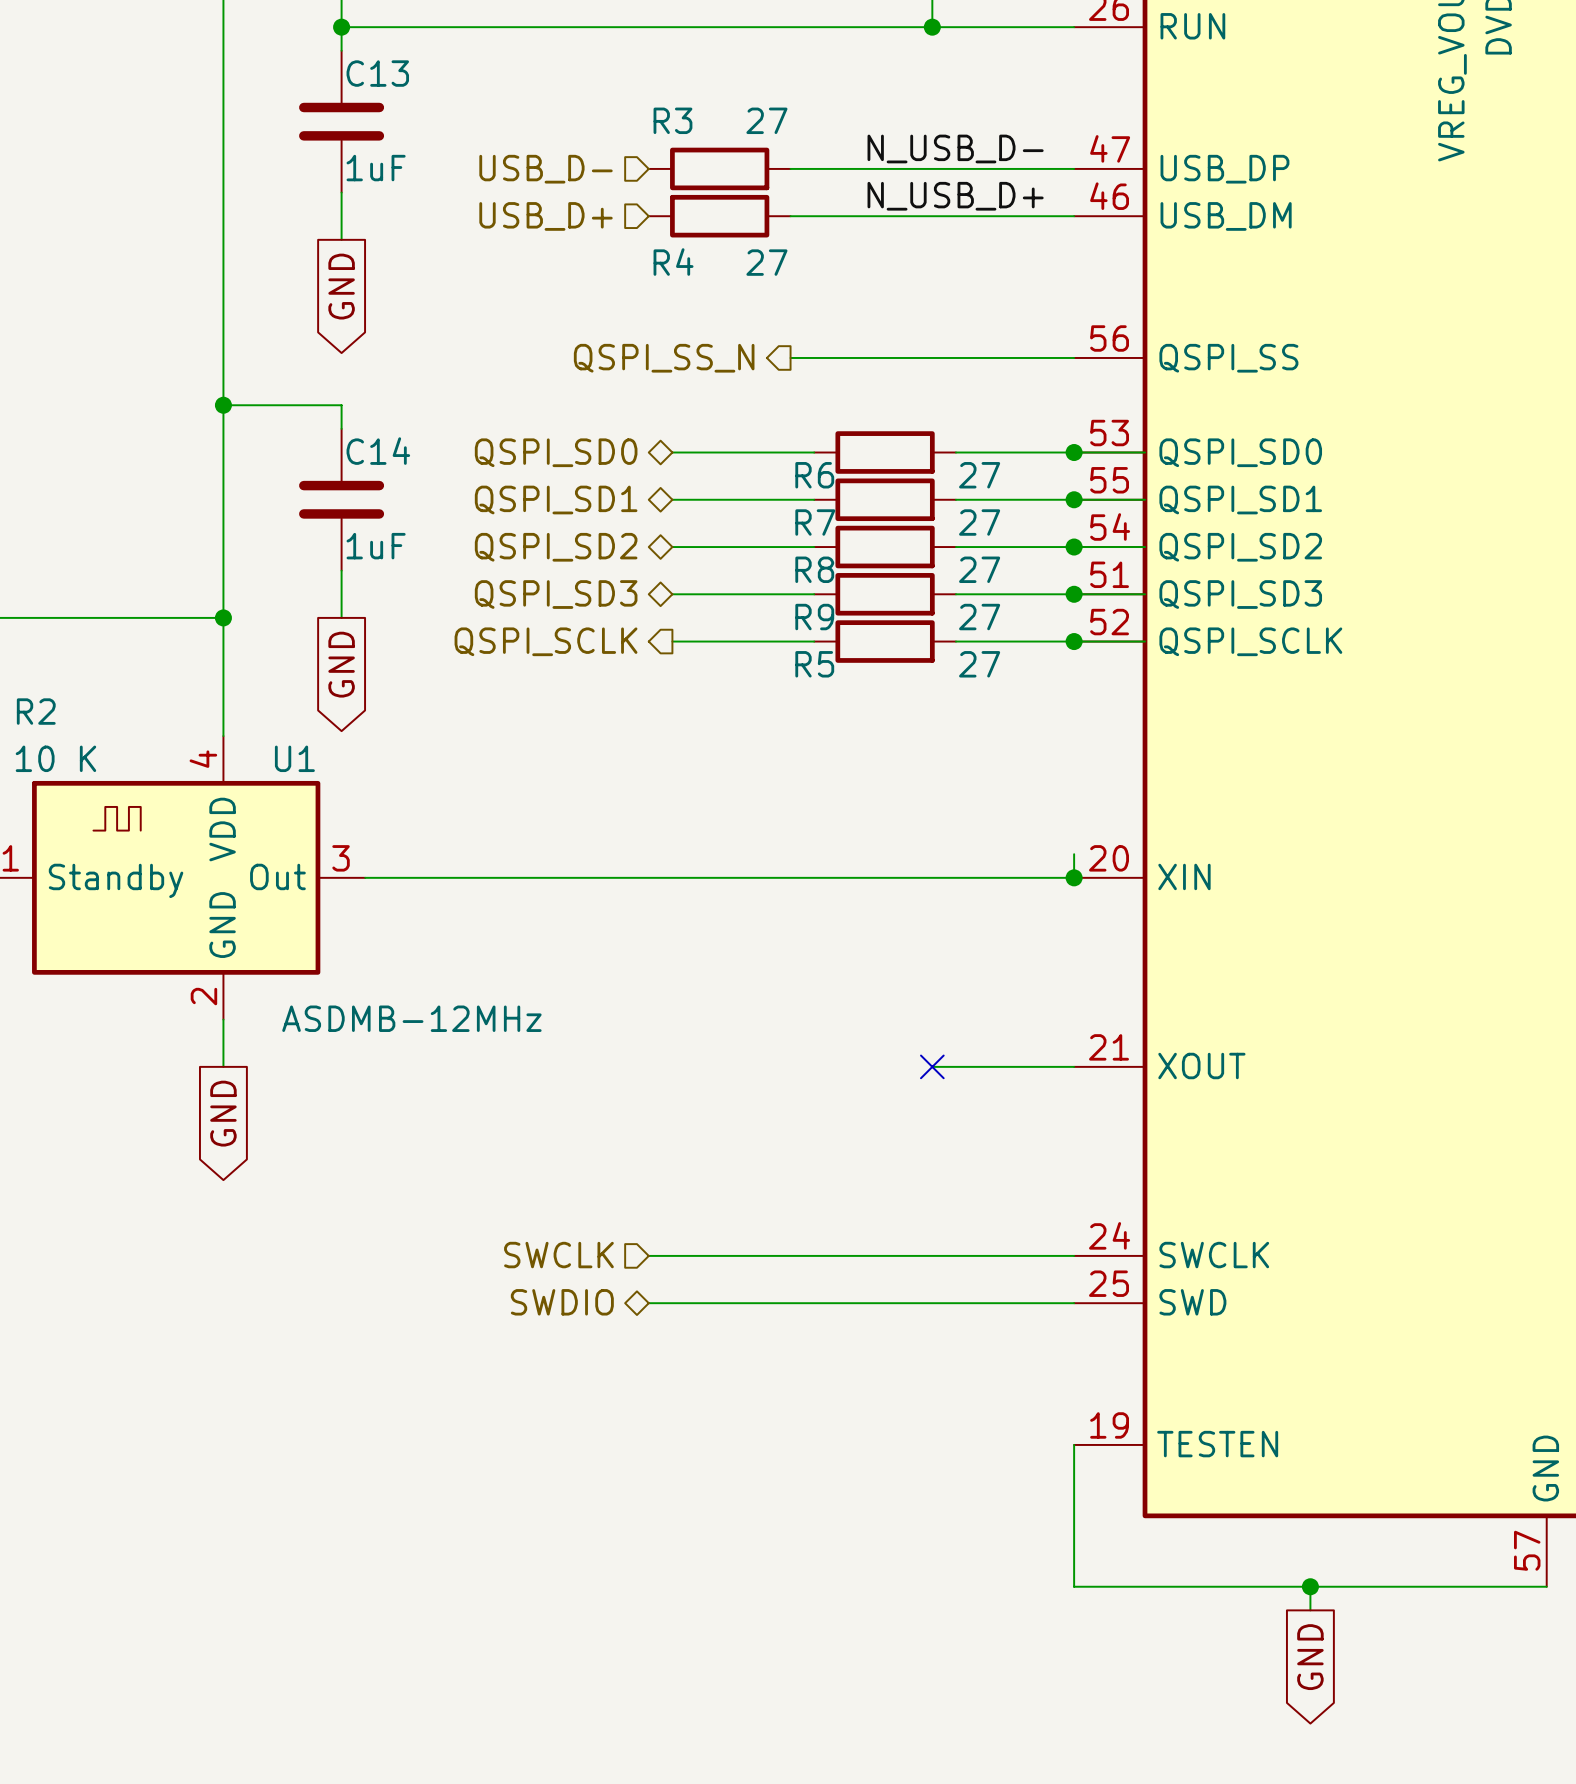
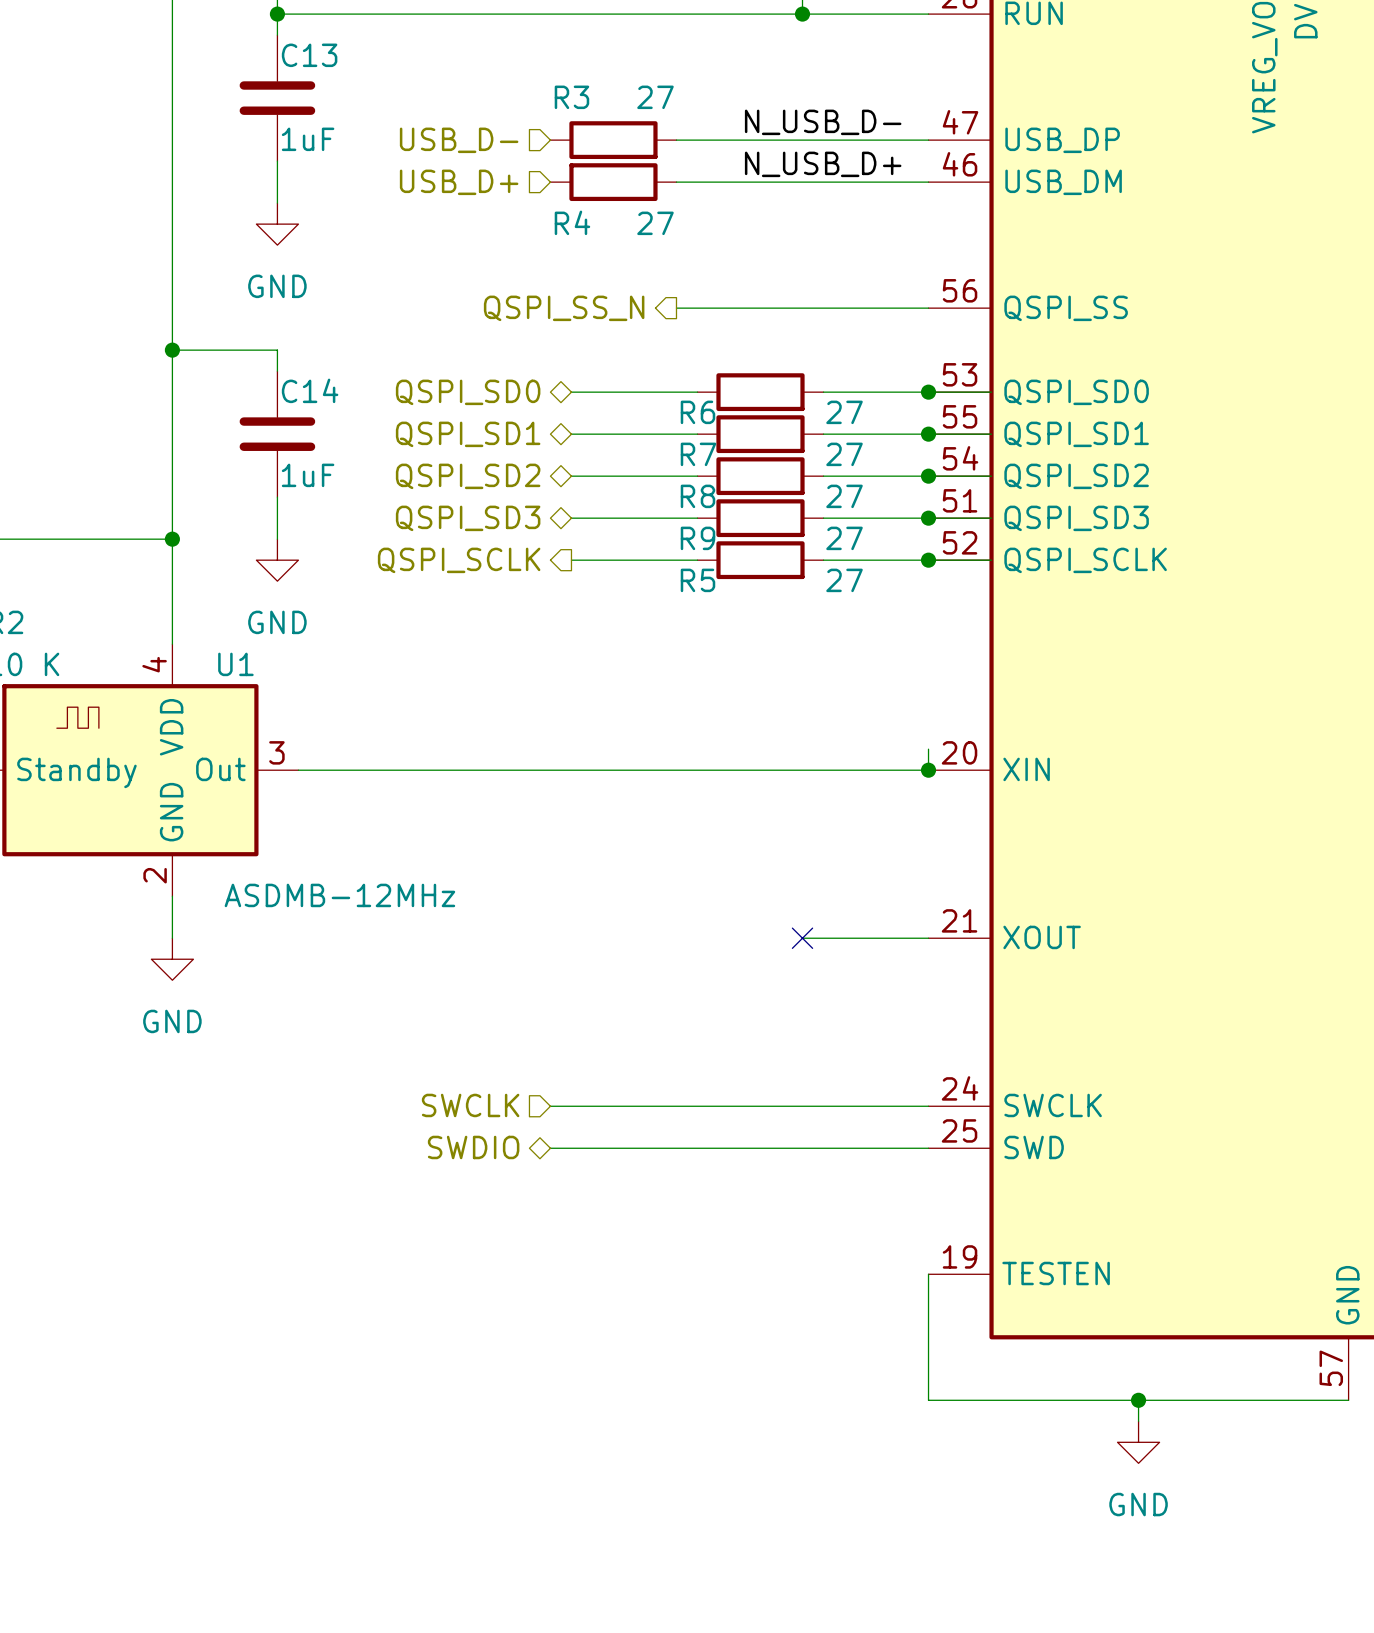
power symbol: none -> GND (277, 224)
global label: GND (341, 286) -> none
power symbol: none -> GND (277, 560)
global label: GND (341, 664) -> none
power symbol: none -> GND (172, 959)
global label: GND (223, 1113) -> none
power symbol: none -> GND (1138, 1442)
global label: GND (1310, 1657) -> none

